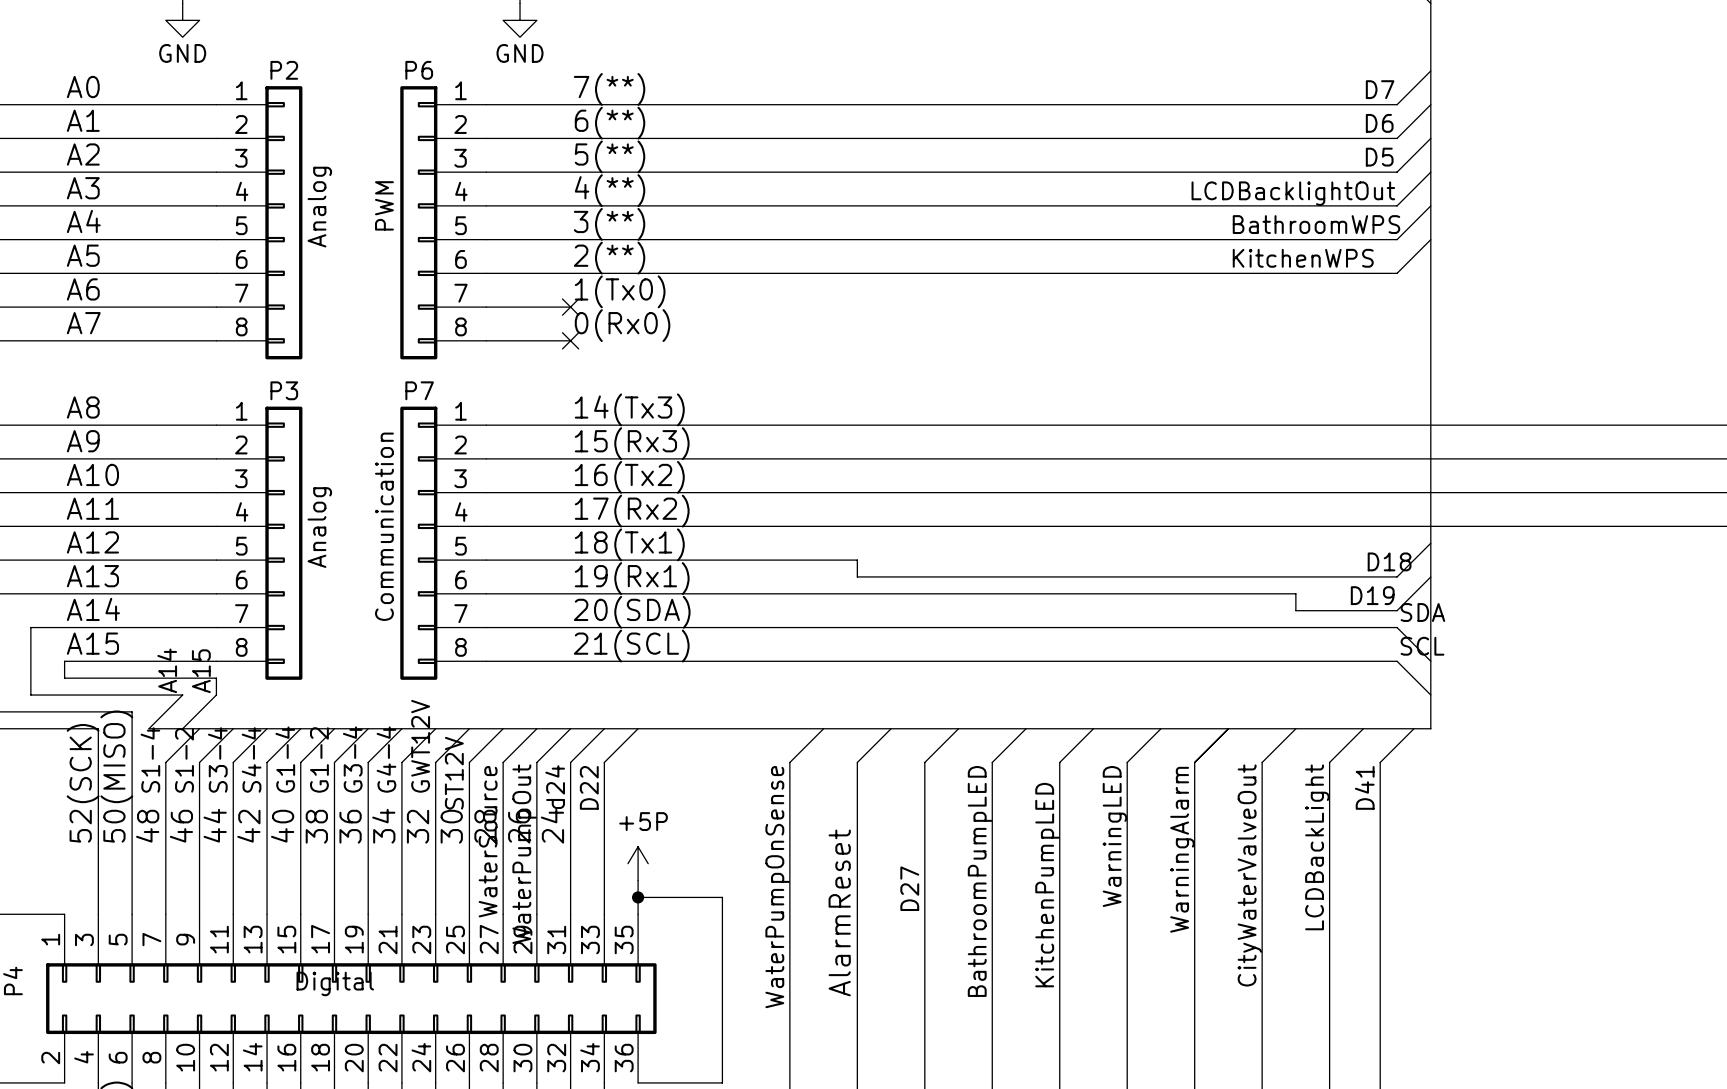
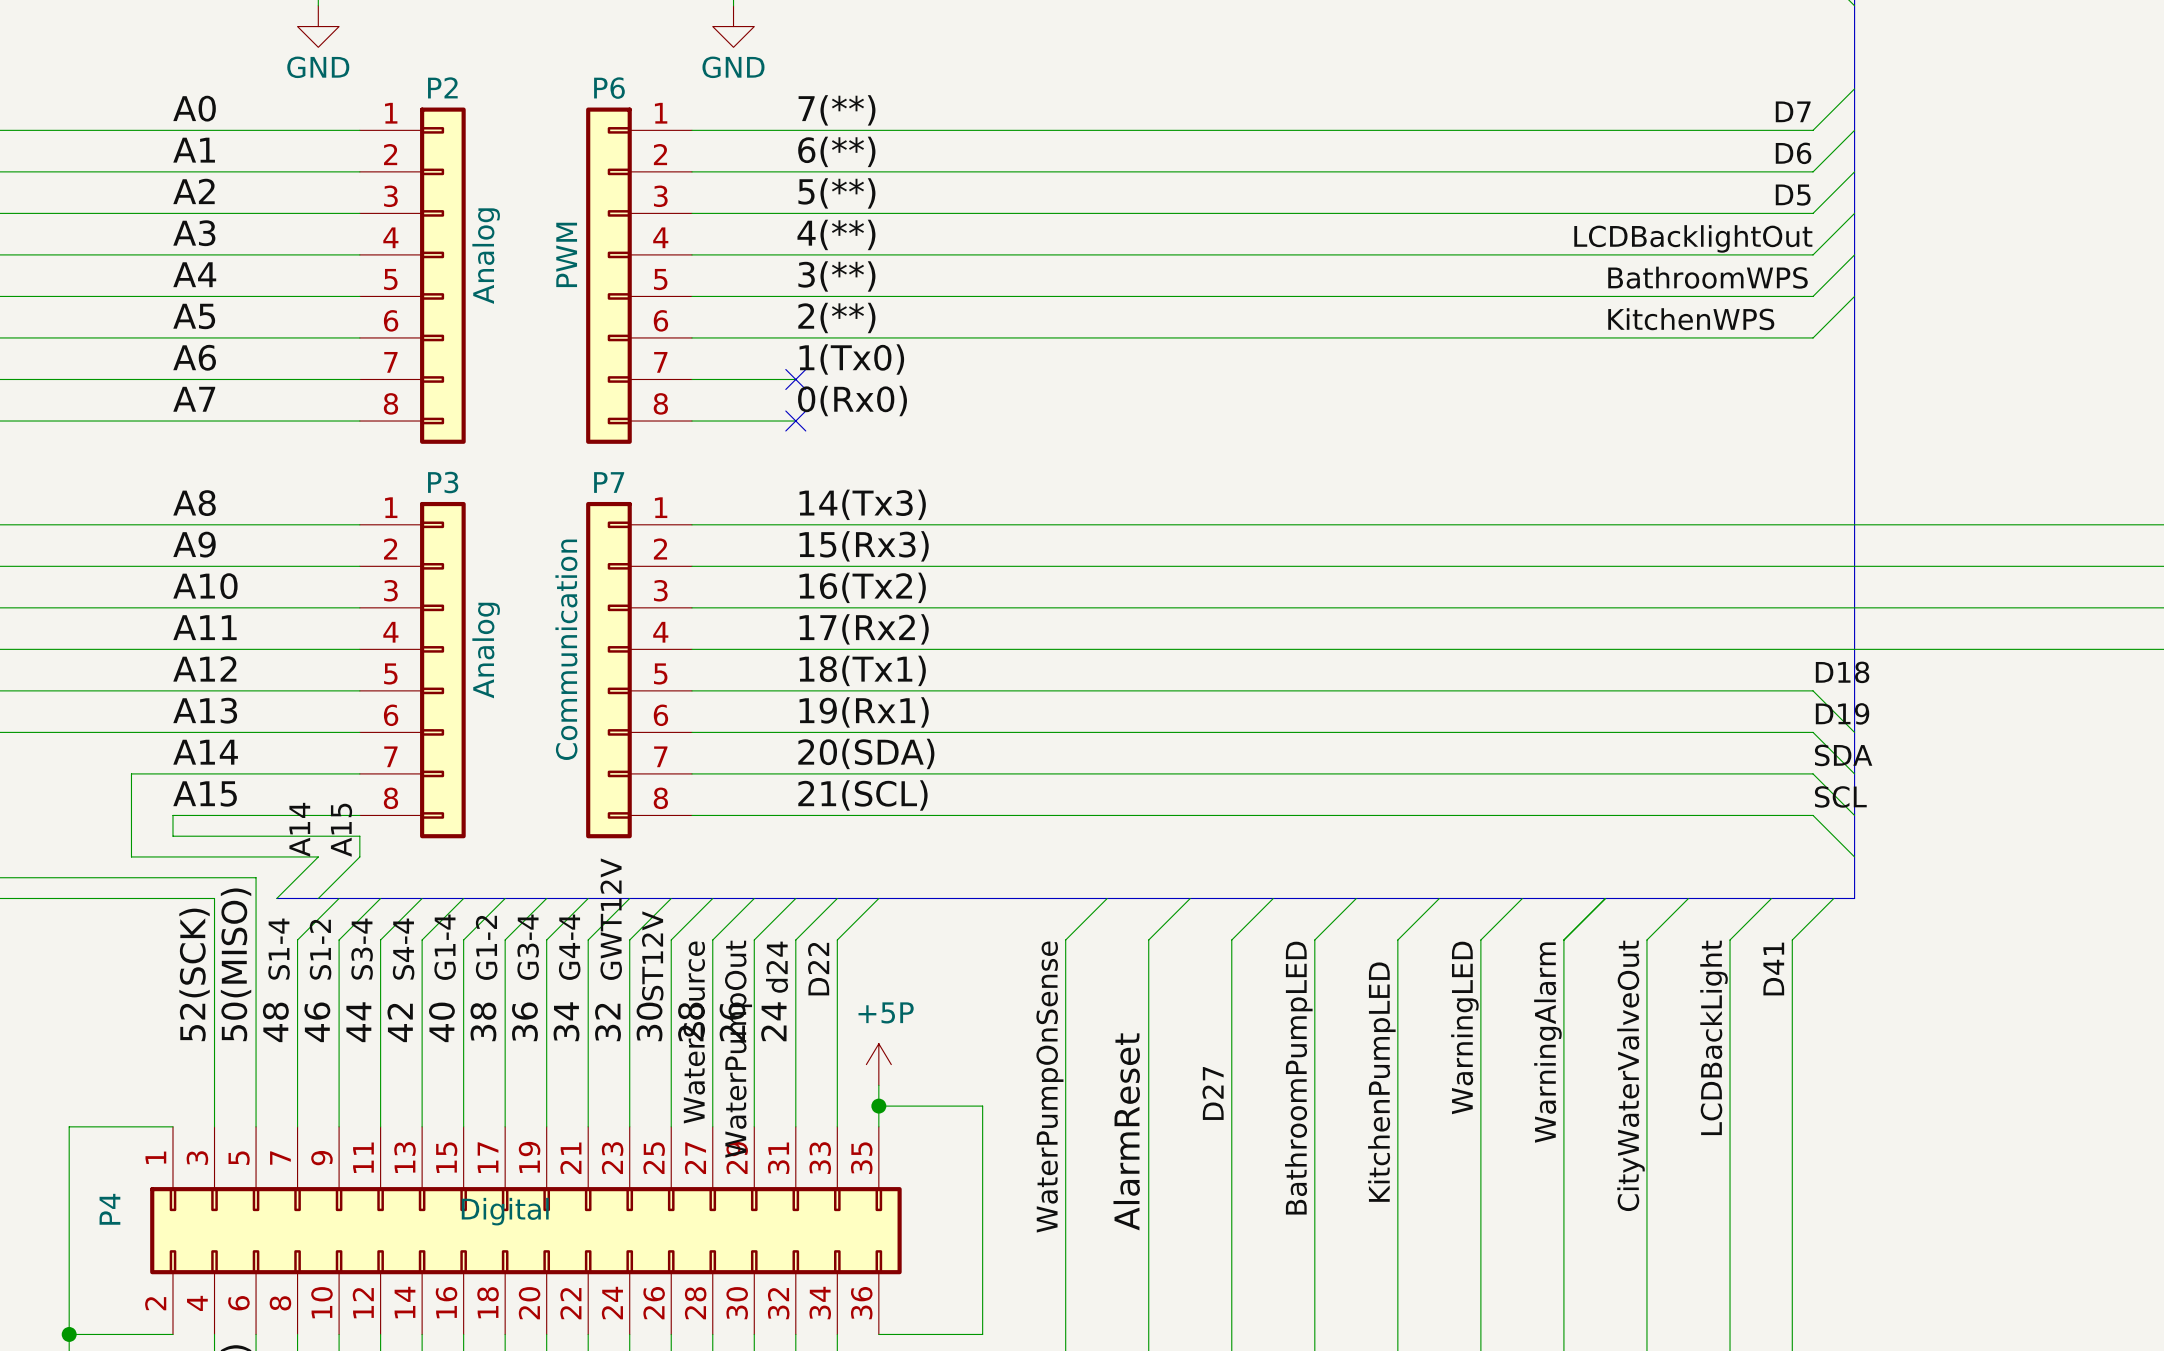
wire: (1430, 543) (1397, 576) (857, 576) (857, 560) -> (1854, 732) (1813, 690) (1148, 690)
label position: D18 (1389, 561) -> D18 (1842, 672)
wire: (1430, 576) (1397, 610) (1295, 610) (1295, 593) -> (1854, 773) (1813, 732) (1688, 732)
label position: D19 (1372, 595) -> D19 (1842, 713)

